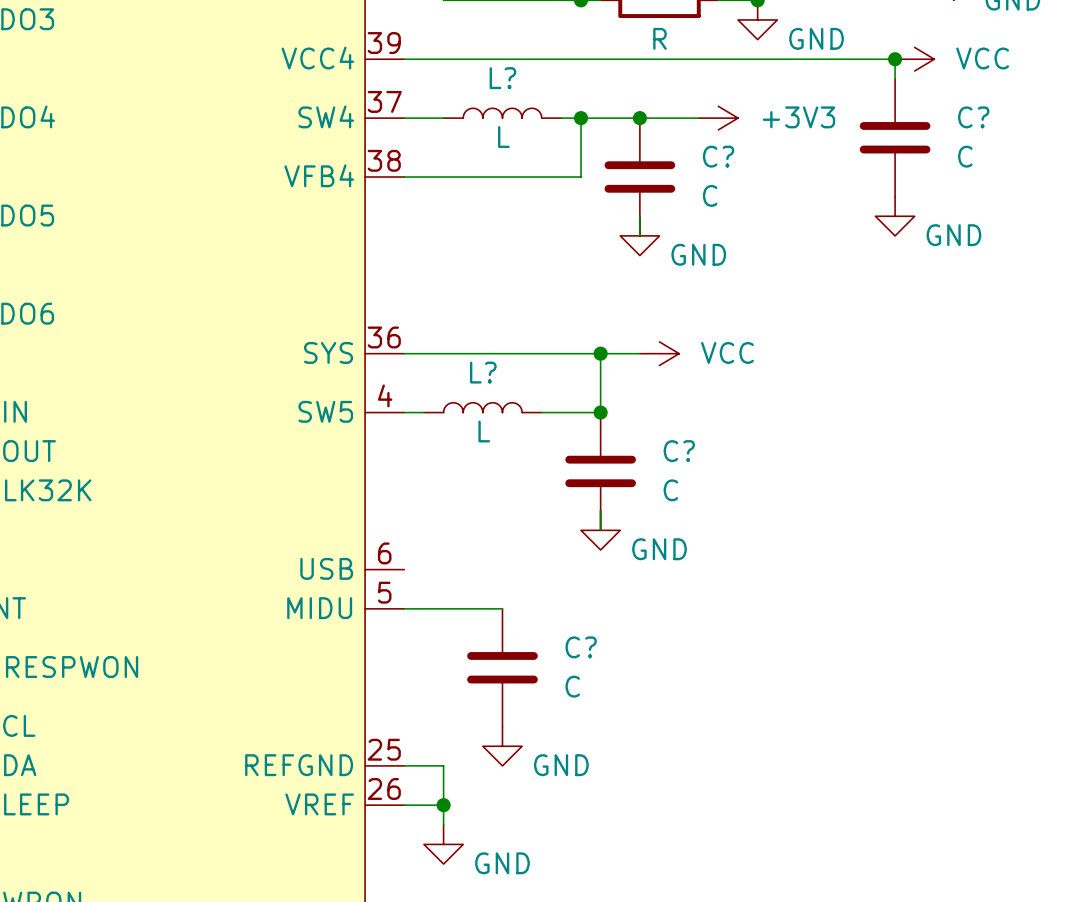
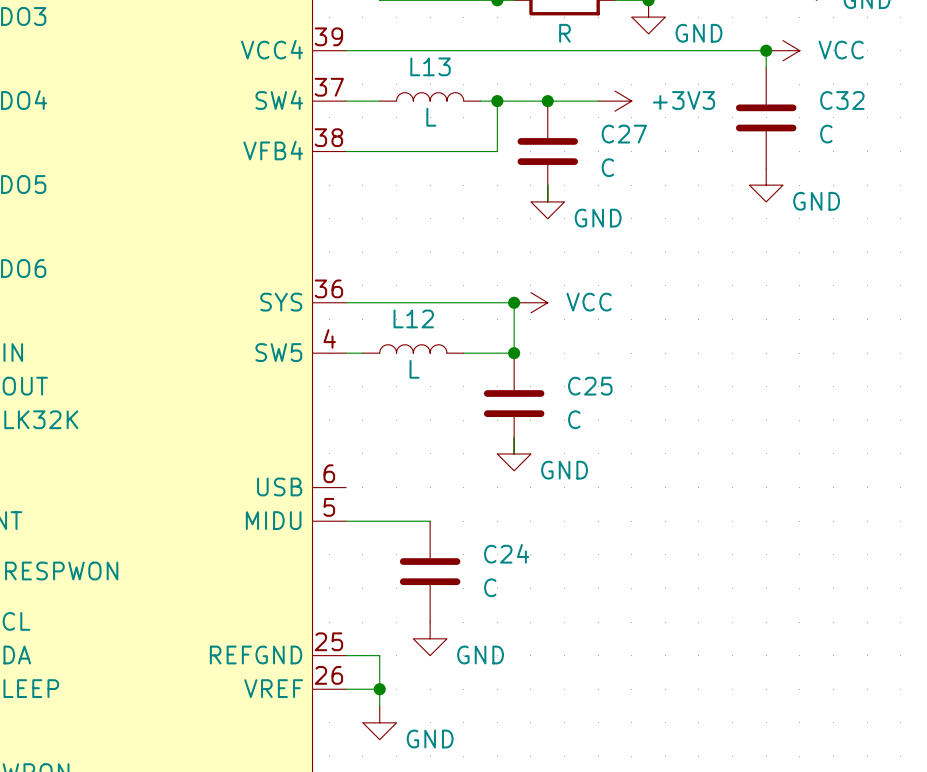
L? name: L? (502, 78) -> L13 (430, 66)
C? name: C? (973, 117) -> C32 (842, 100)
C? name: C? (718, 156) -> C27 (624, 134)
power symbol position: VCC (659, 353) -> VCC (530, 302)
L? name: L? (483, 372) -> L12 (413, 318)
C? name: C? (679, 451) -> C25 (590, 386)
C? name: C? (581, 647) -> C24 (506, 553)

